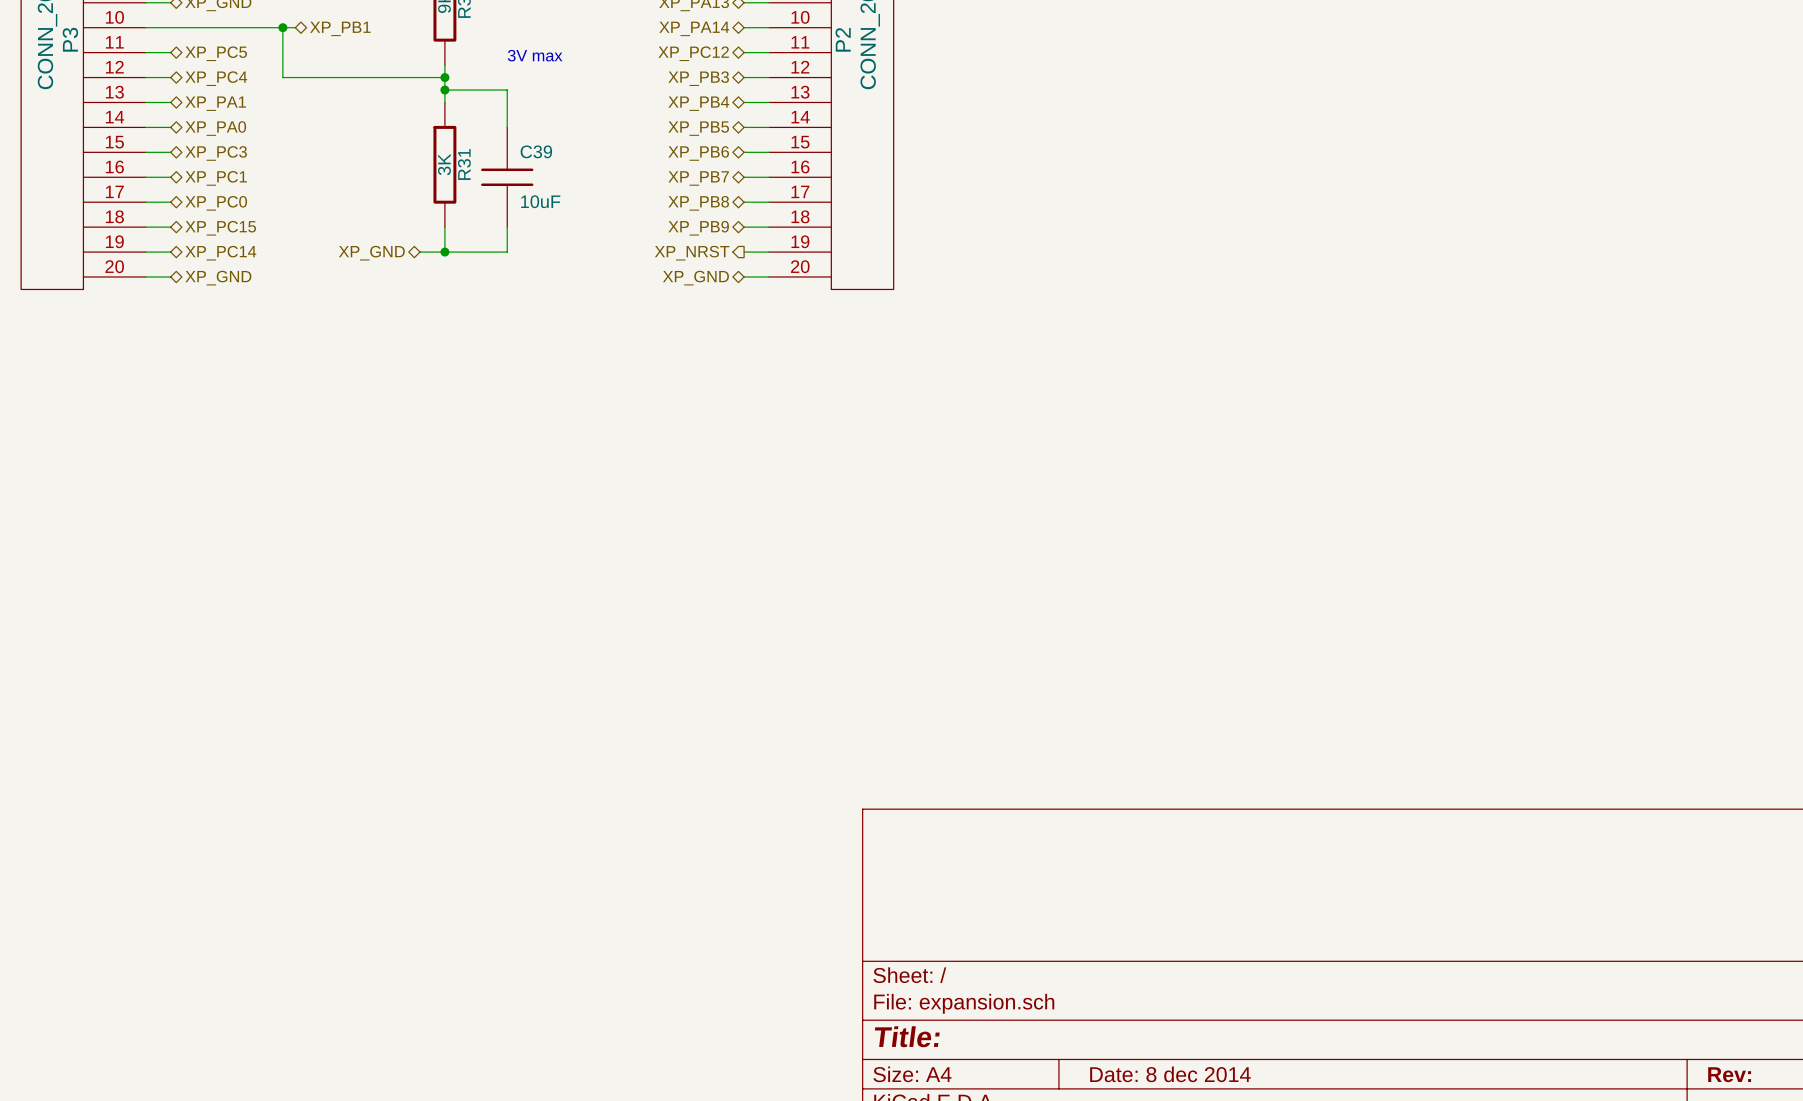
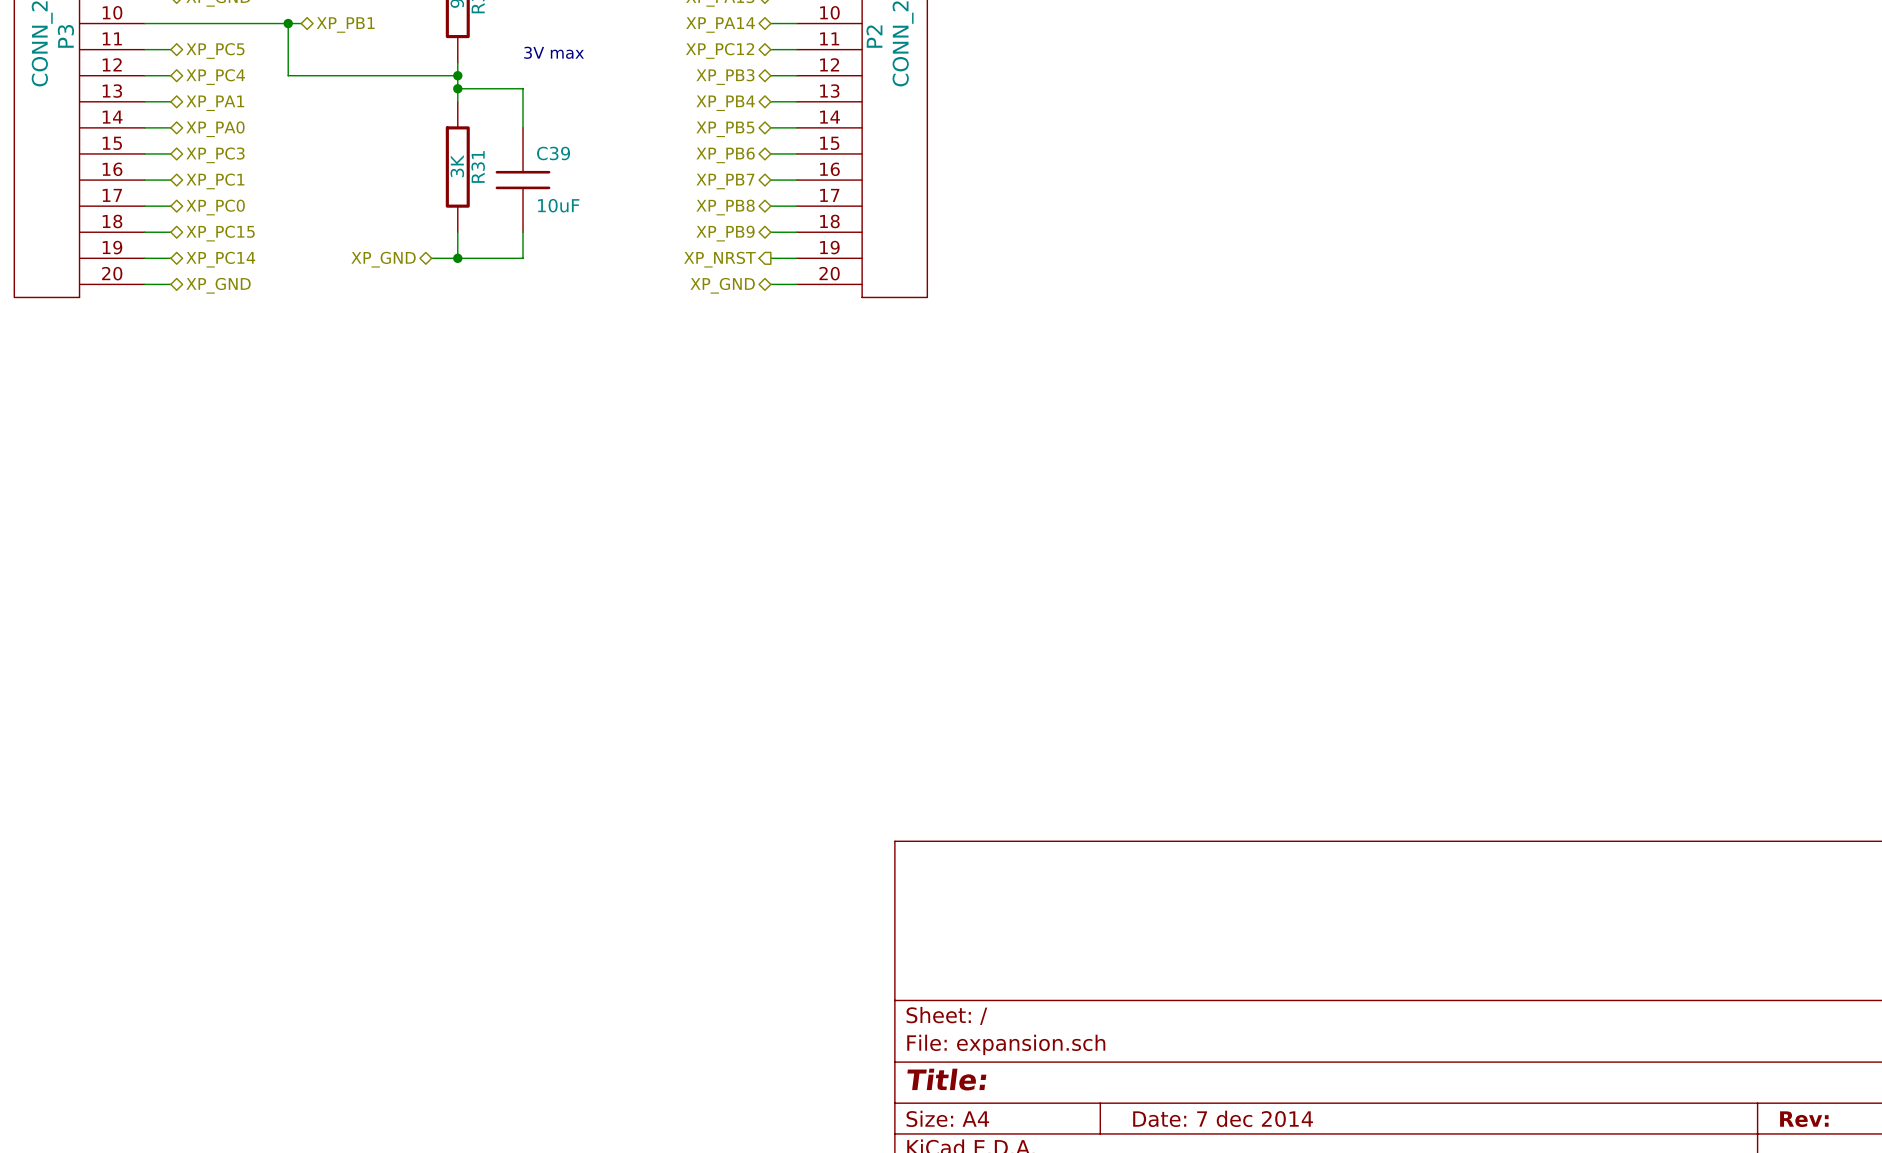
title block: Date: 8 dec 2014 (1170, 1074) -> Date: 7 dec 2014 (1223, 1118)

